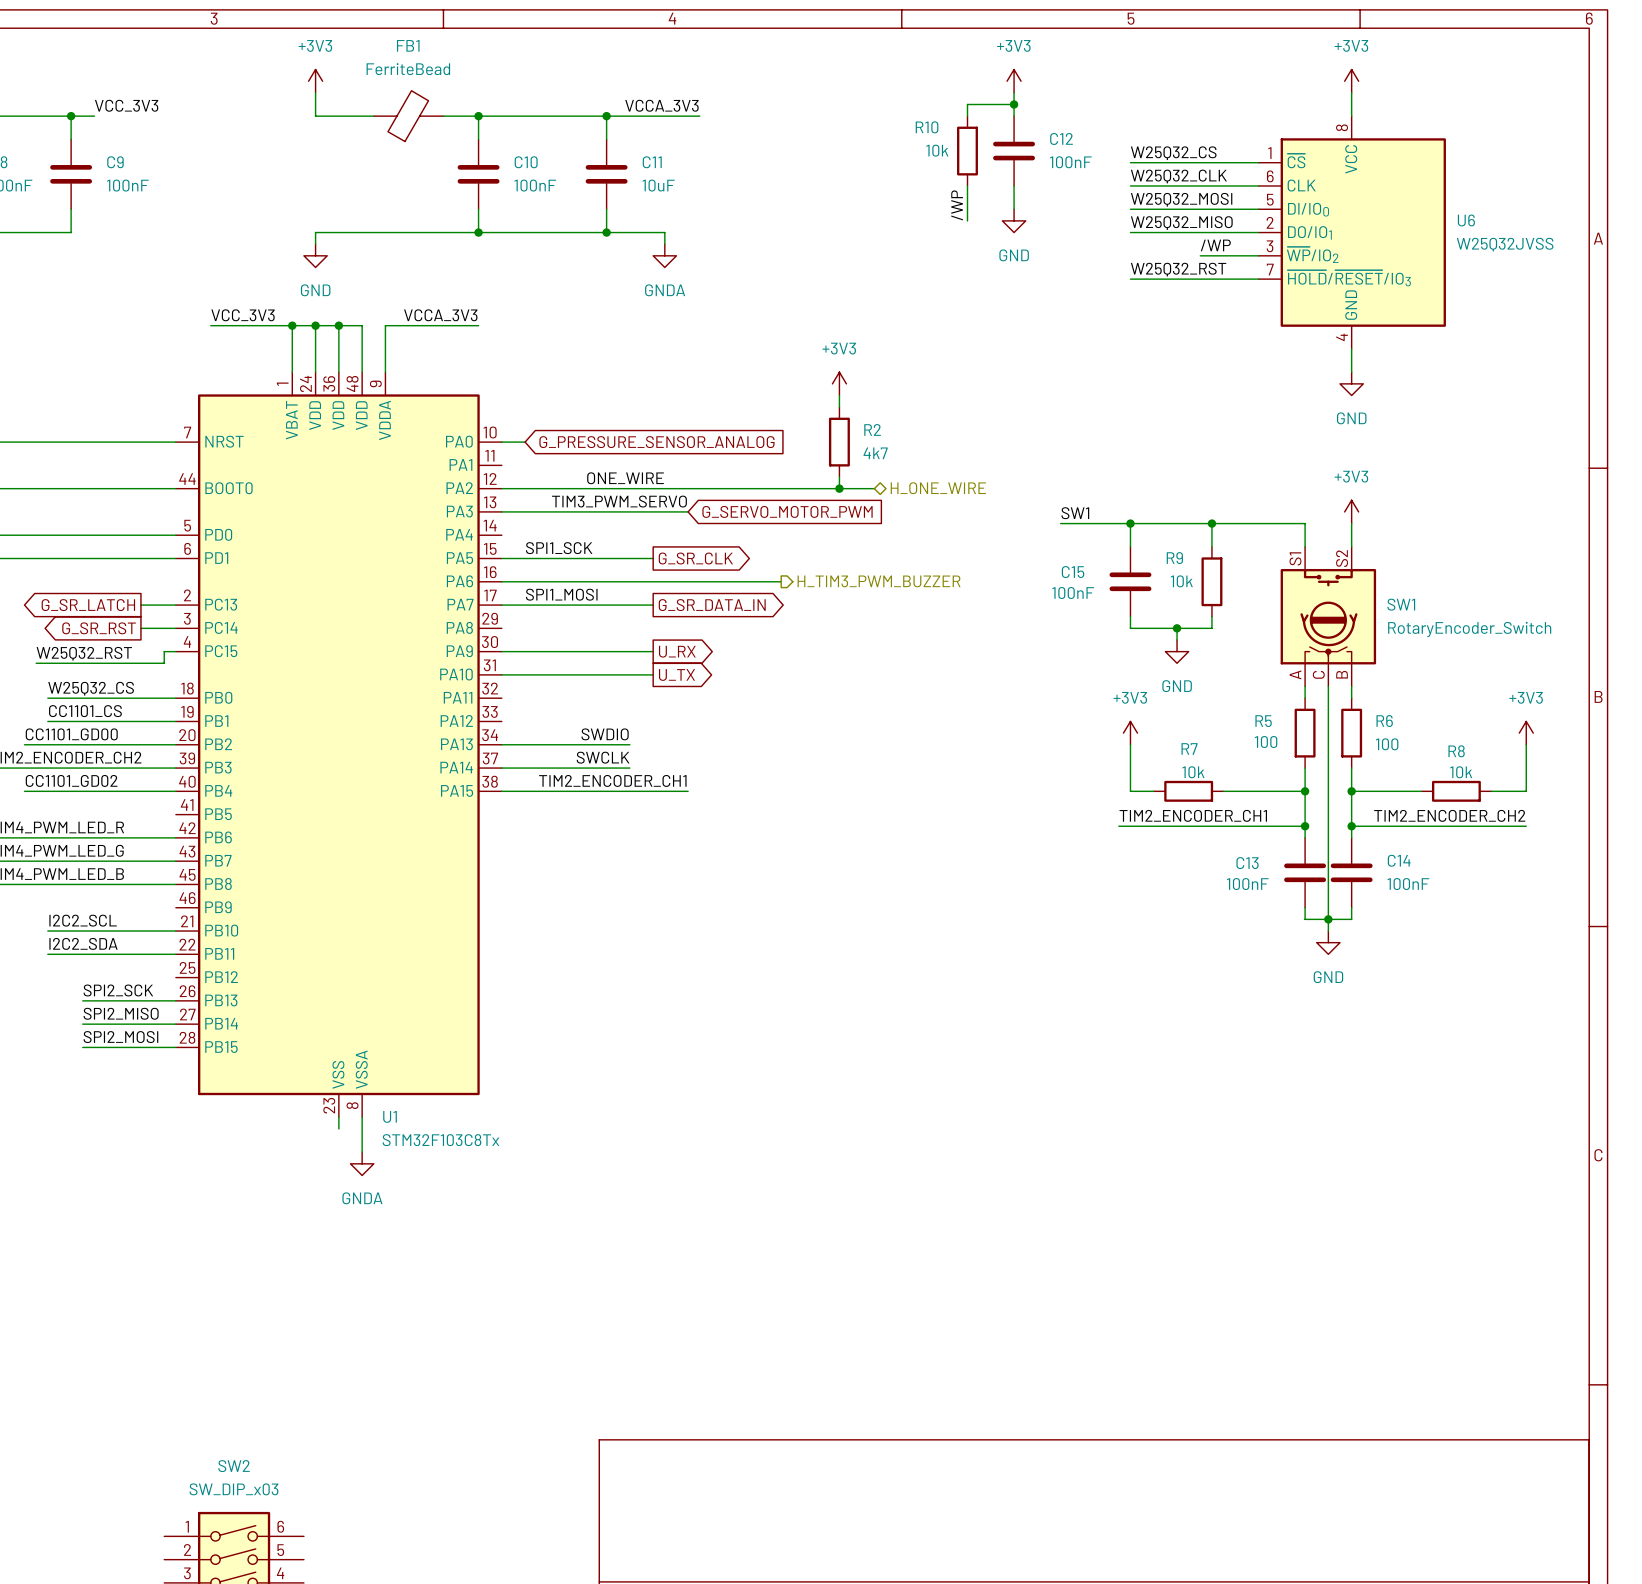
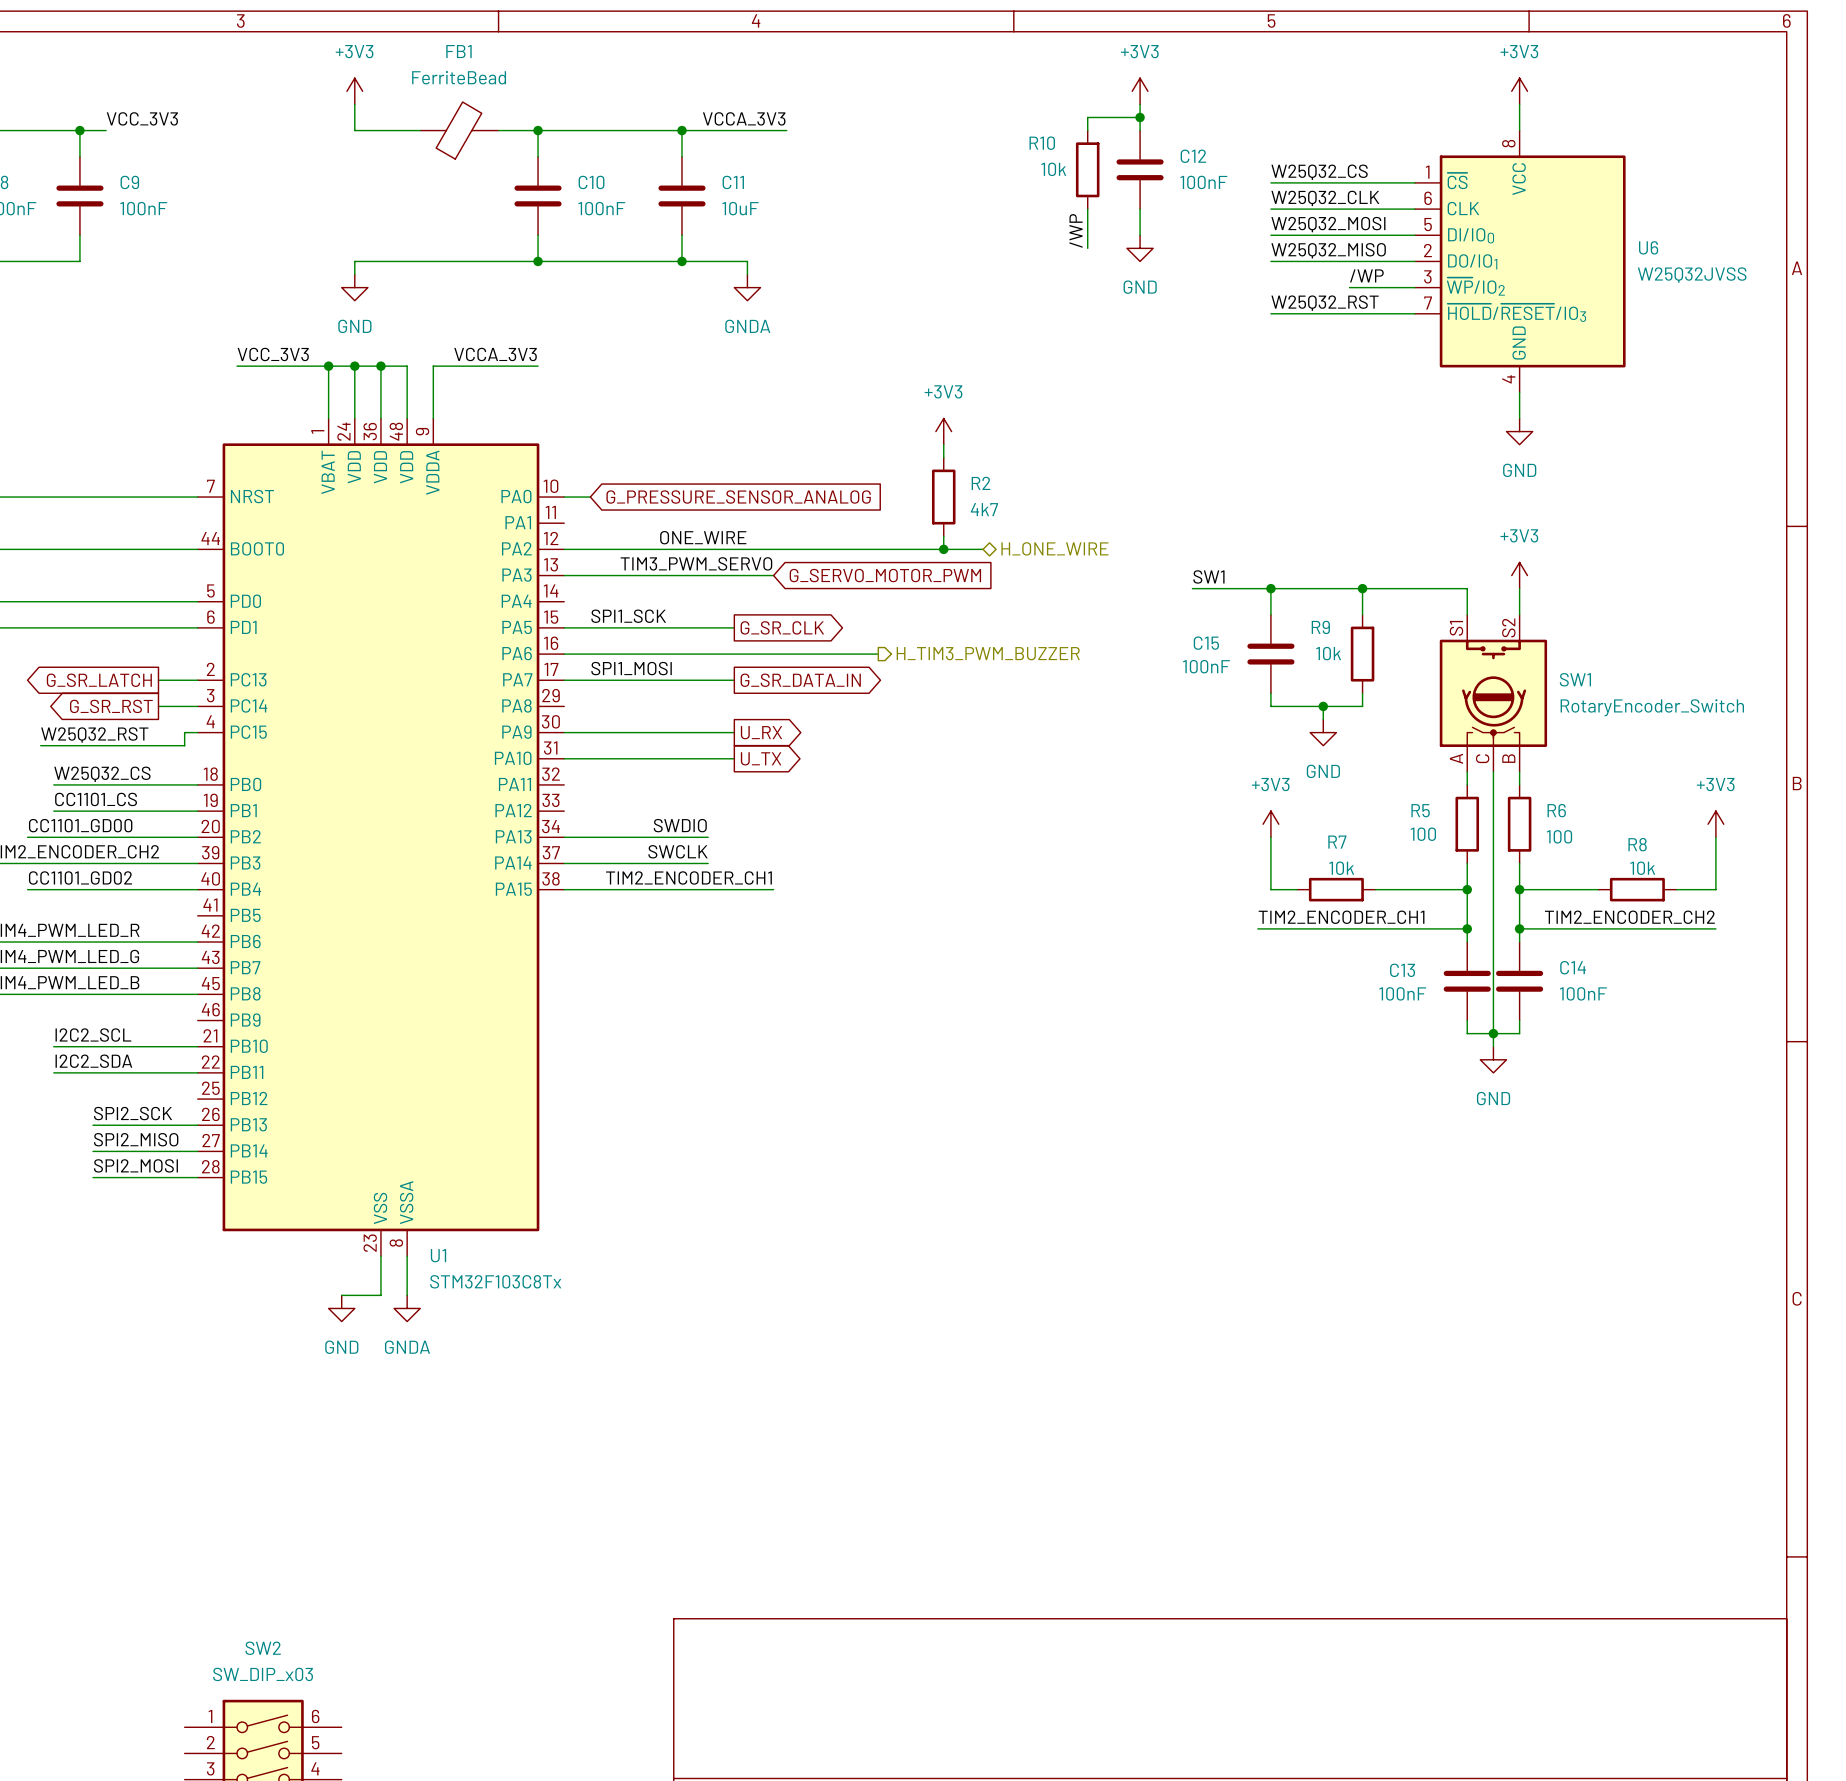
wire: none -> (380, 1269) (380, 1295) (341, 1295)
power symbol: none -> GND (341, 1308)

